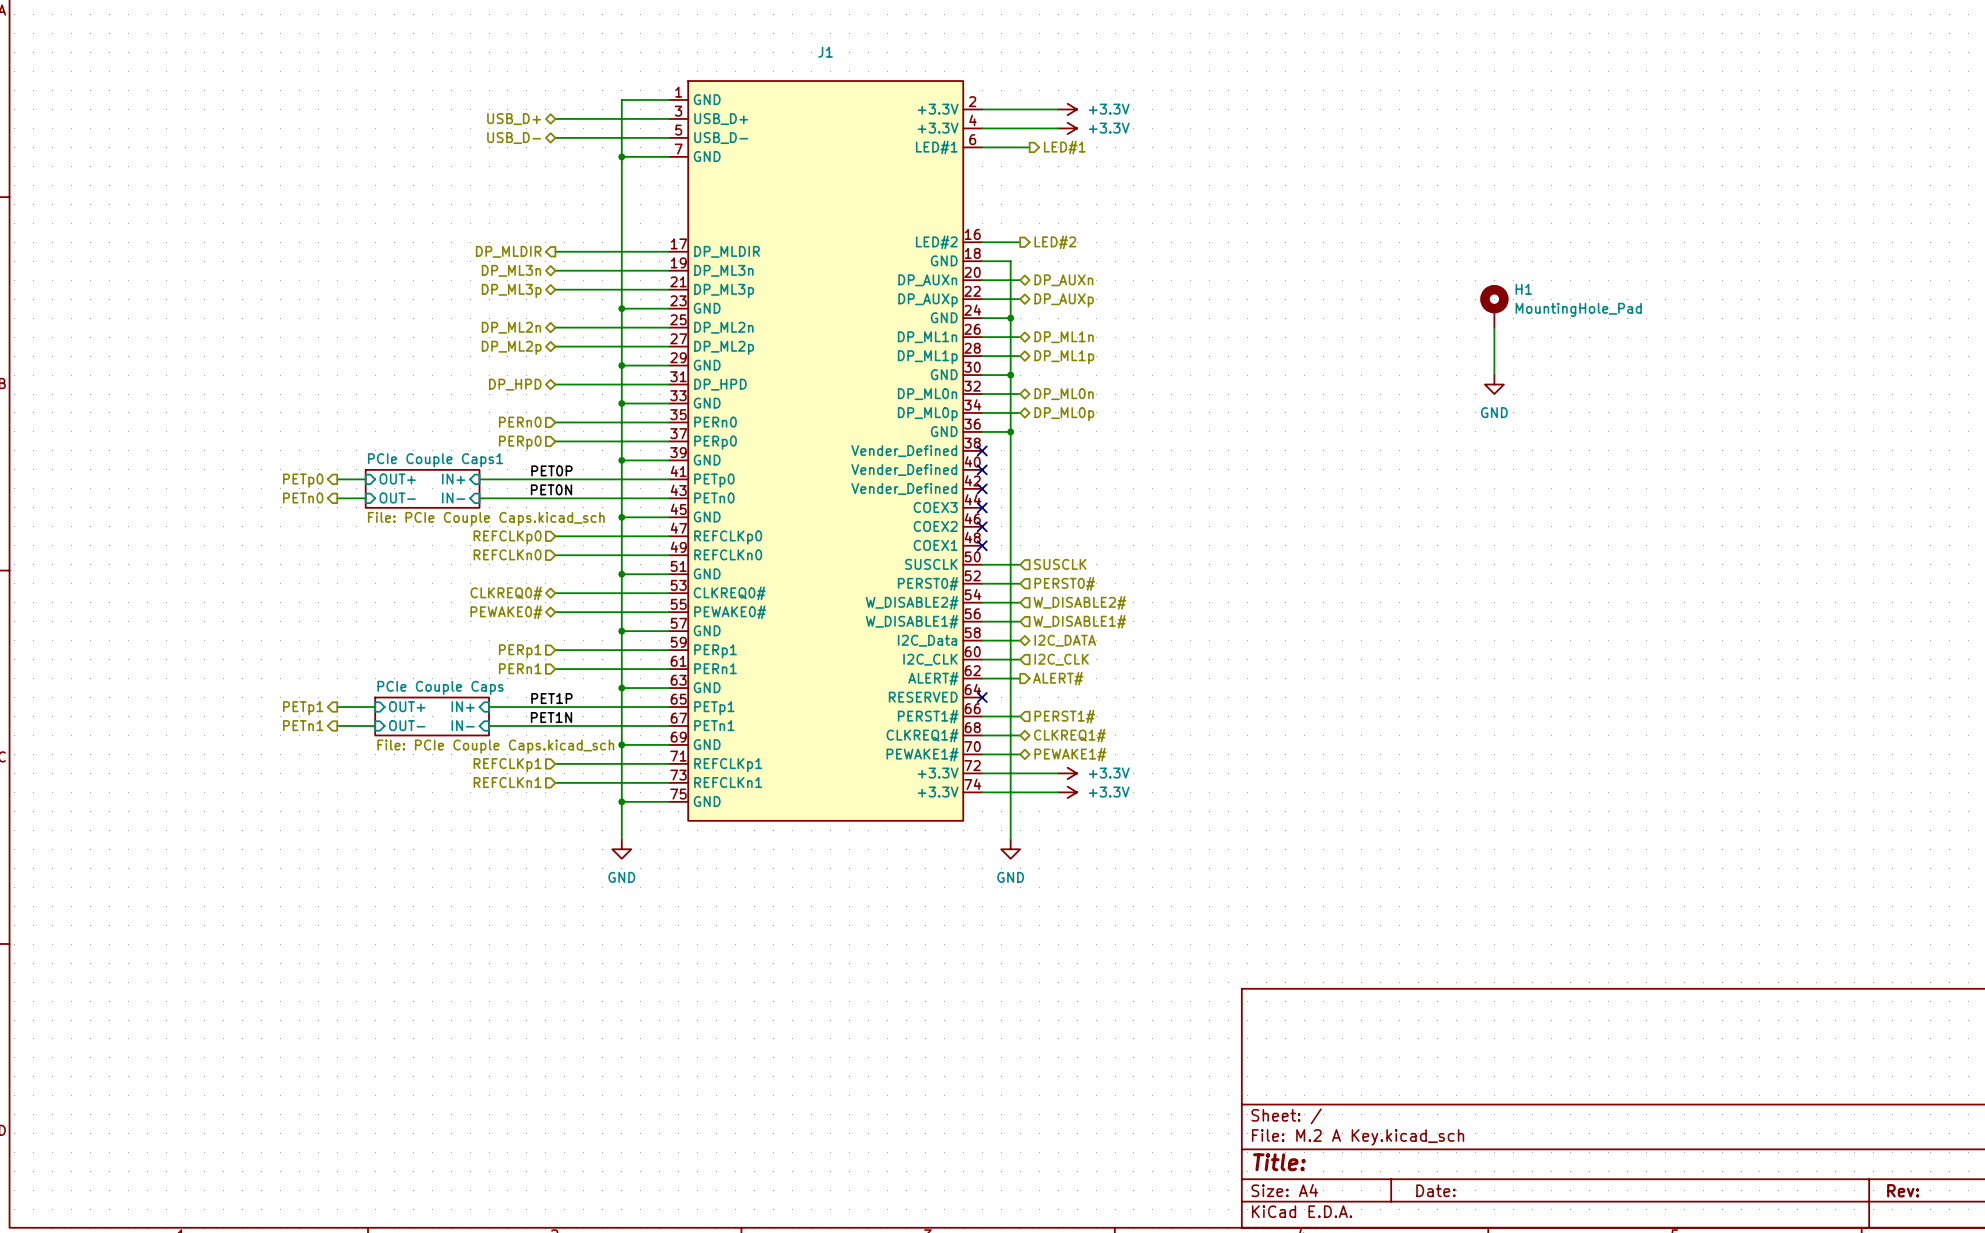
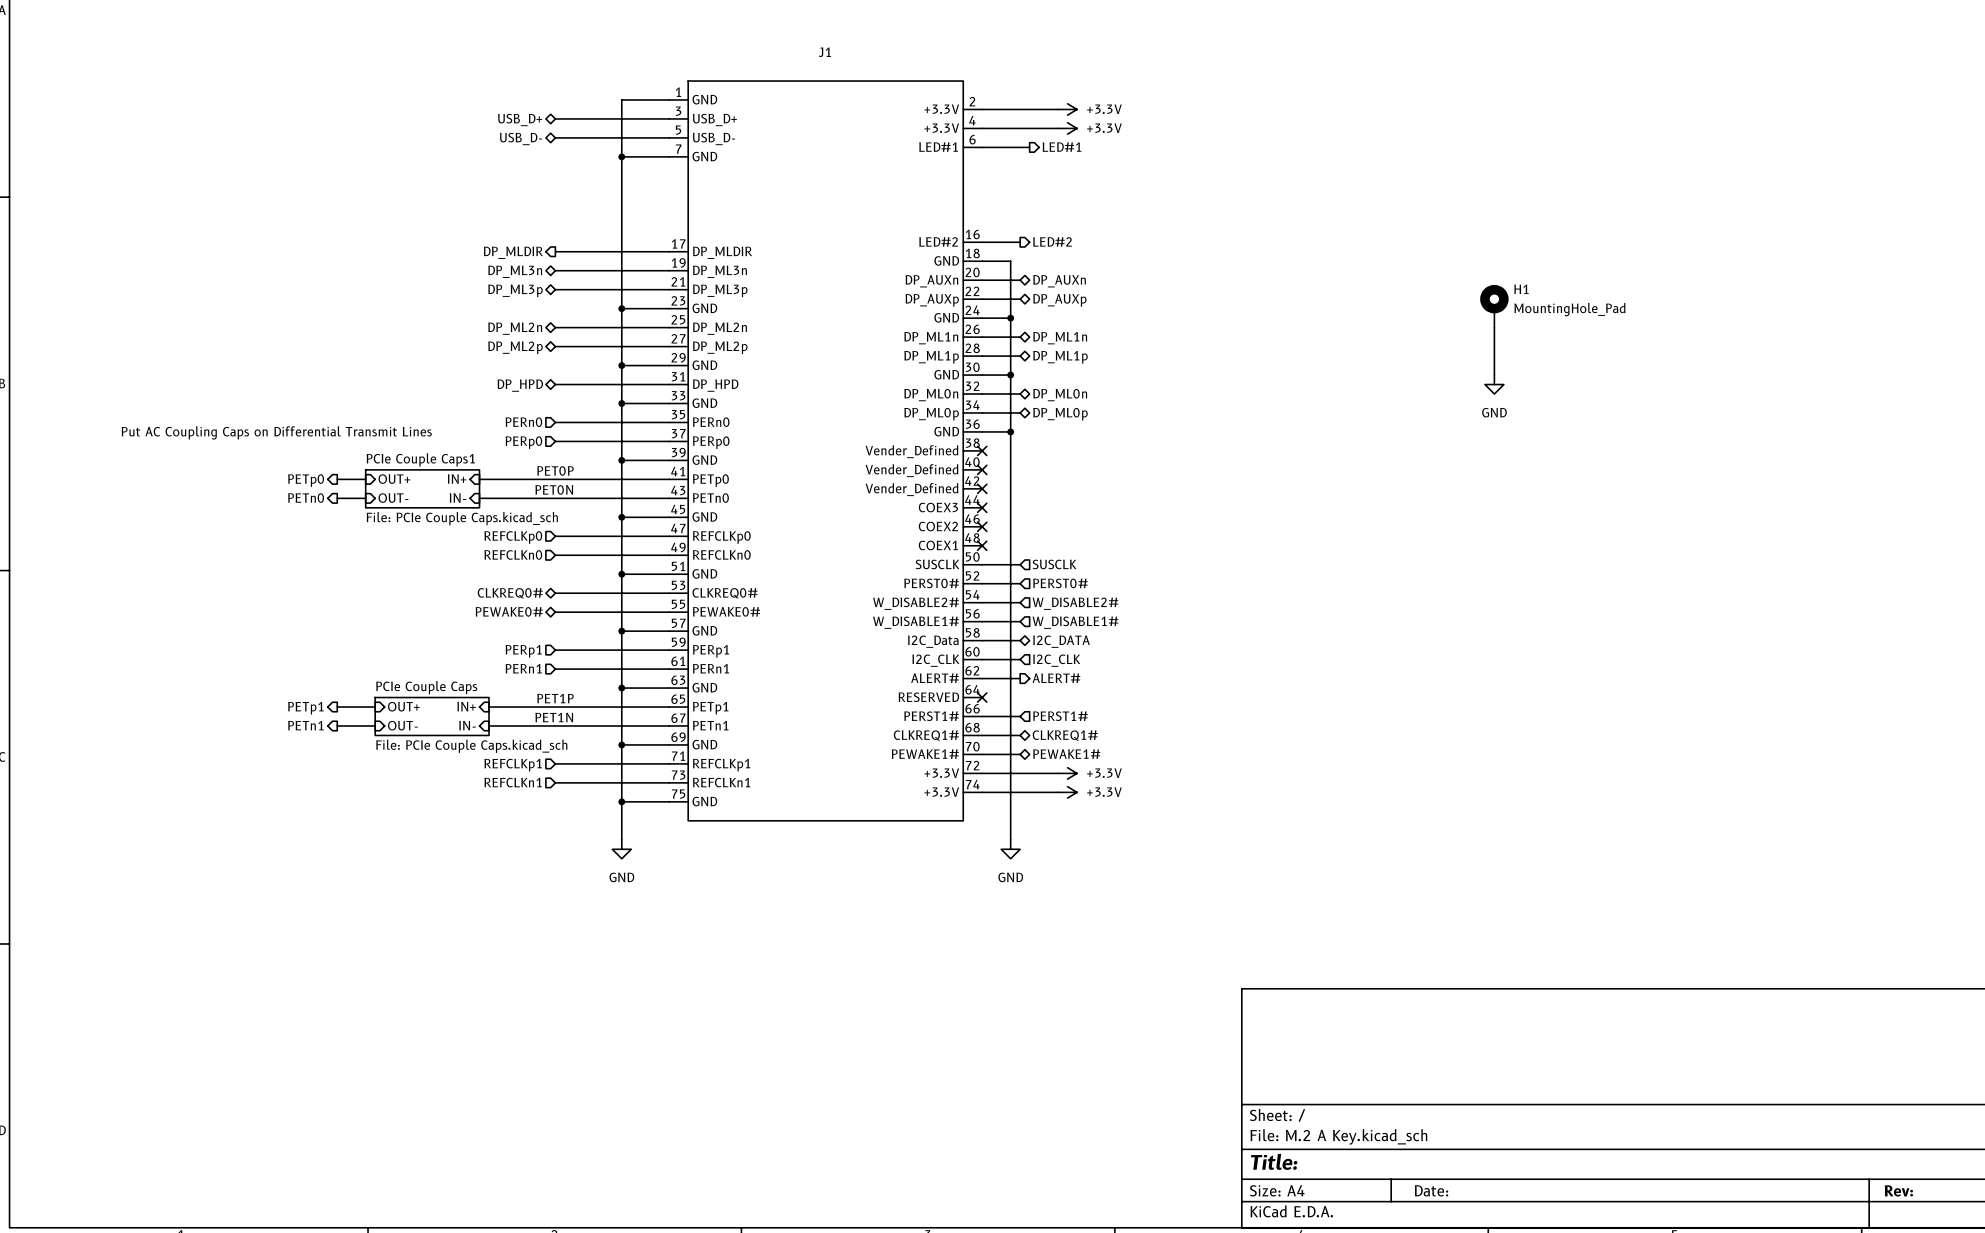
text: none -> Put AC Coupling Caps on Differential Transmit Lines (276, 432)

